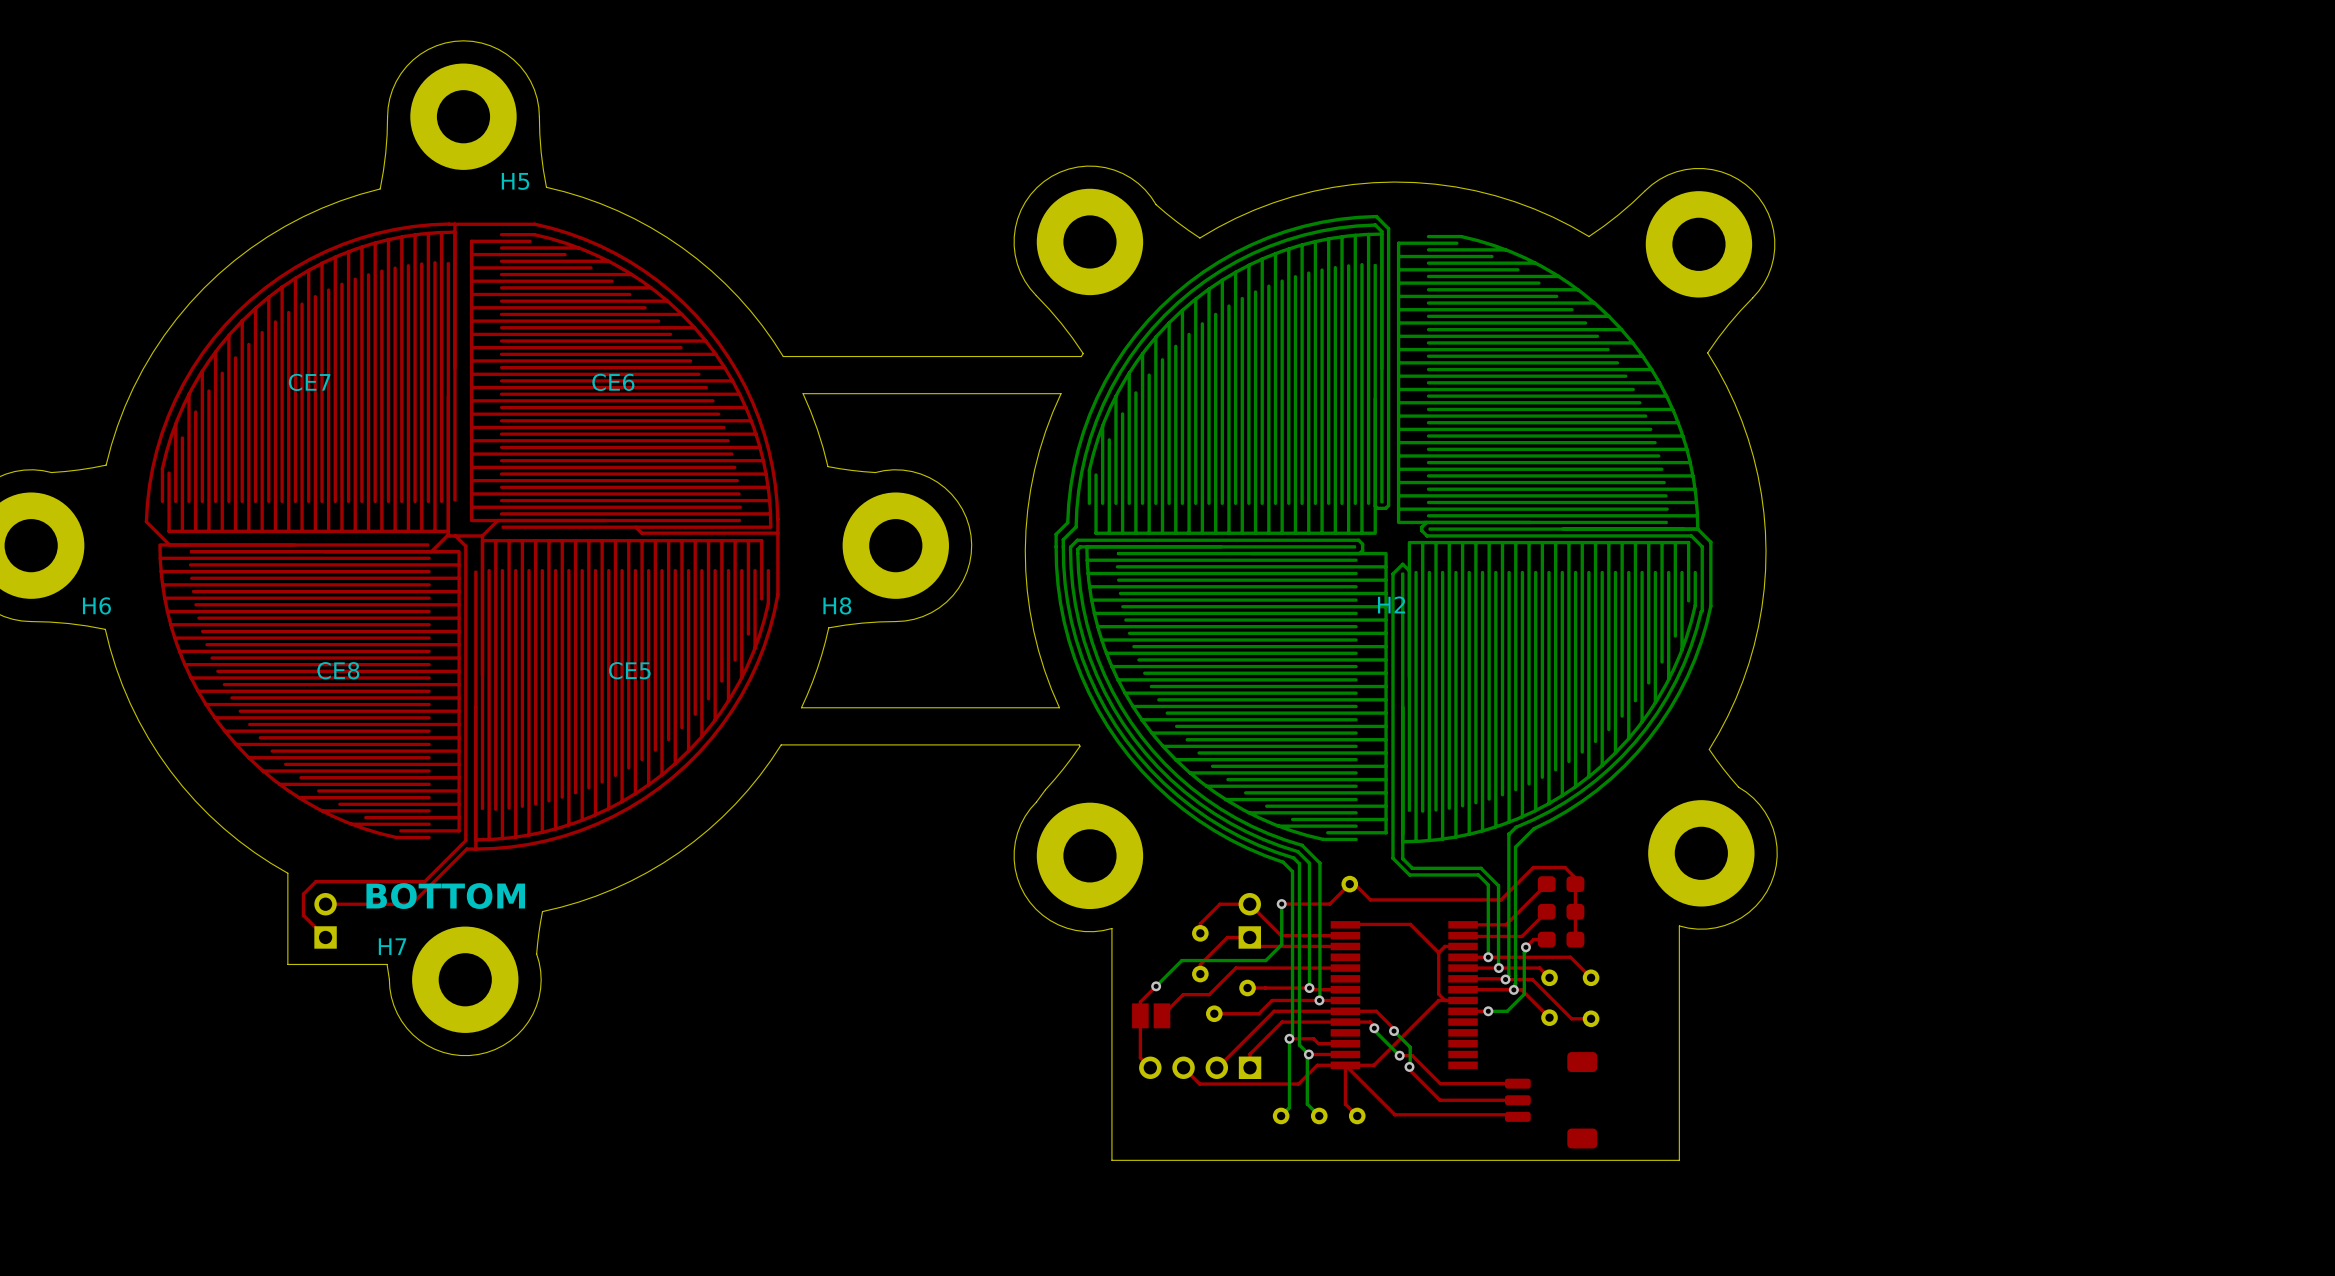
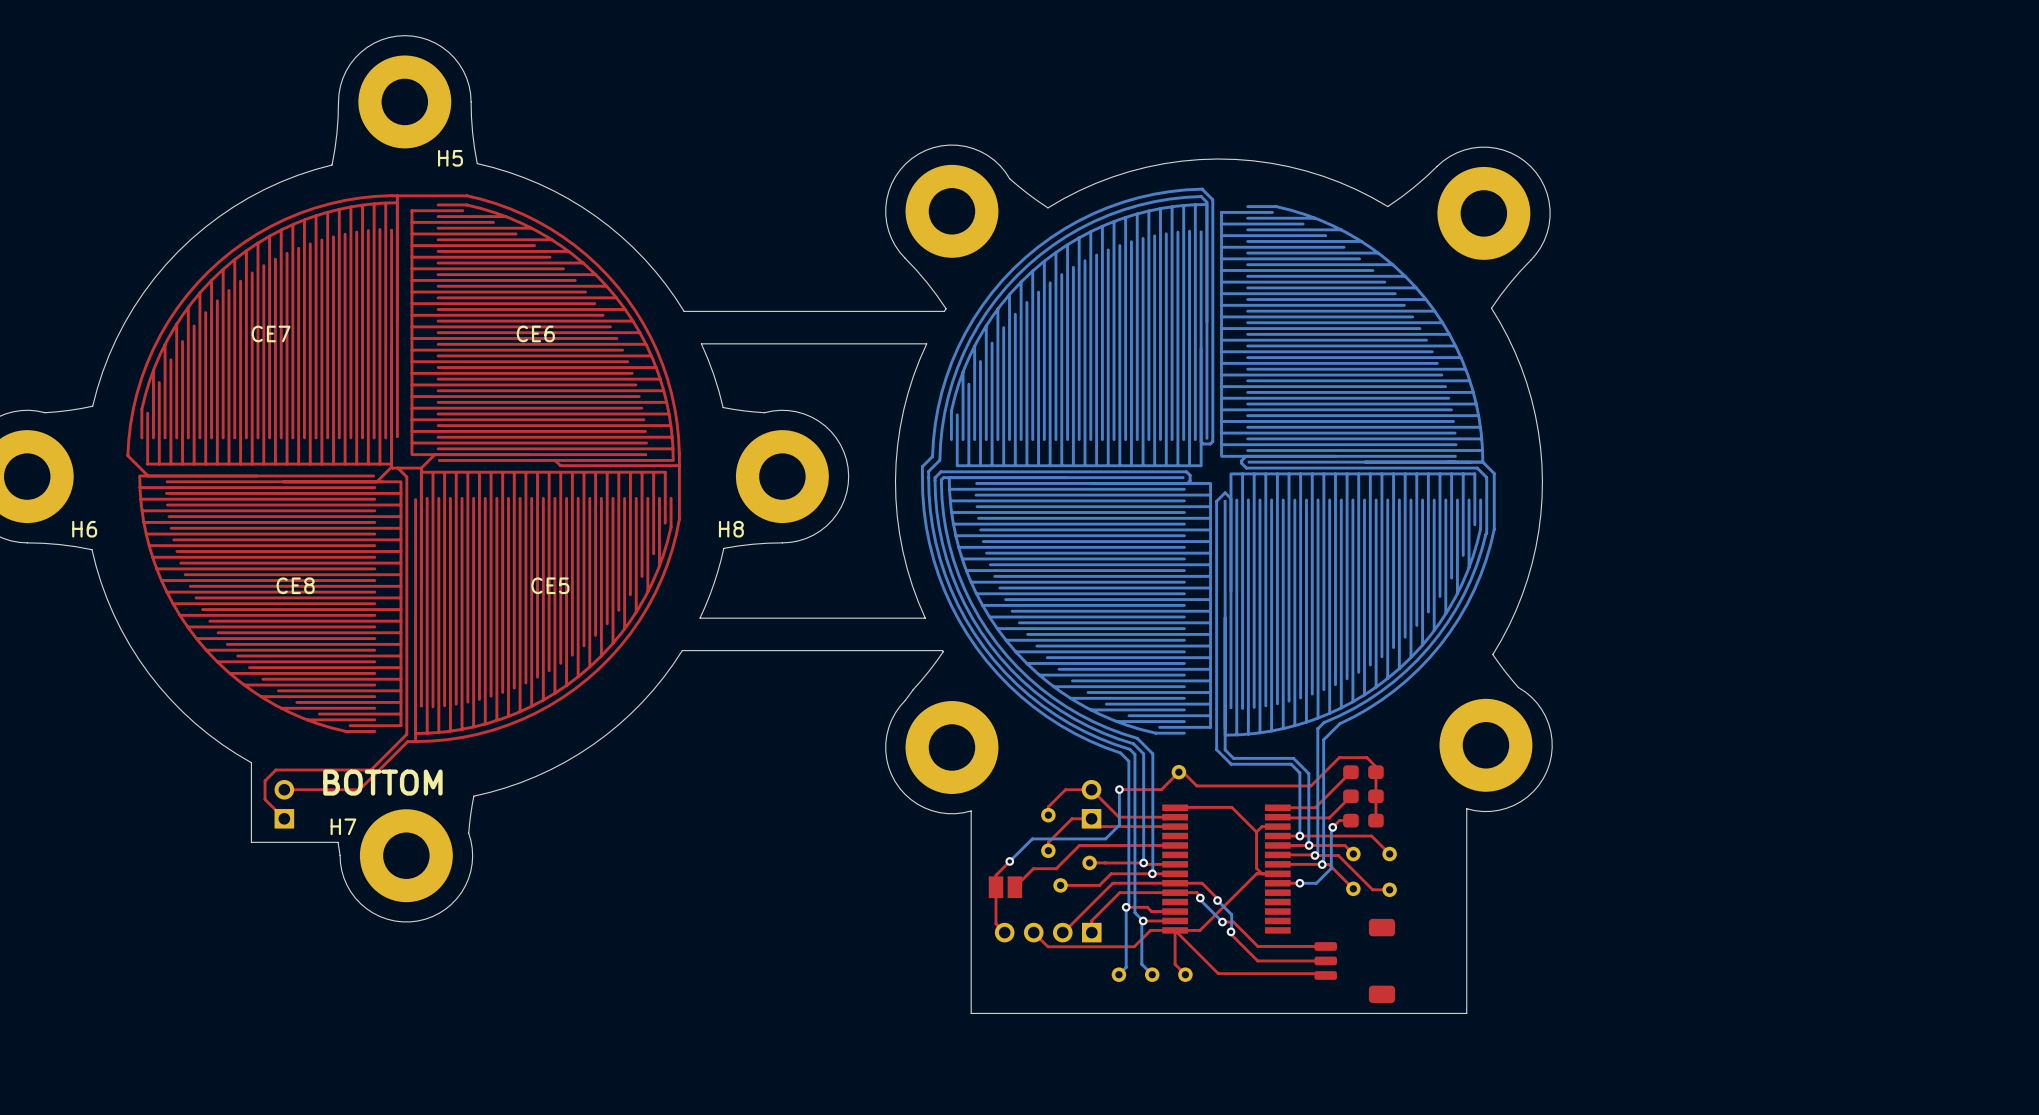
text: H2 (1391, 604) -> none

